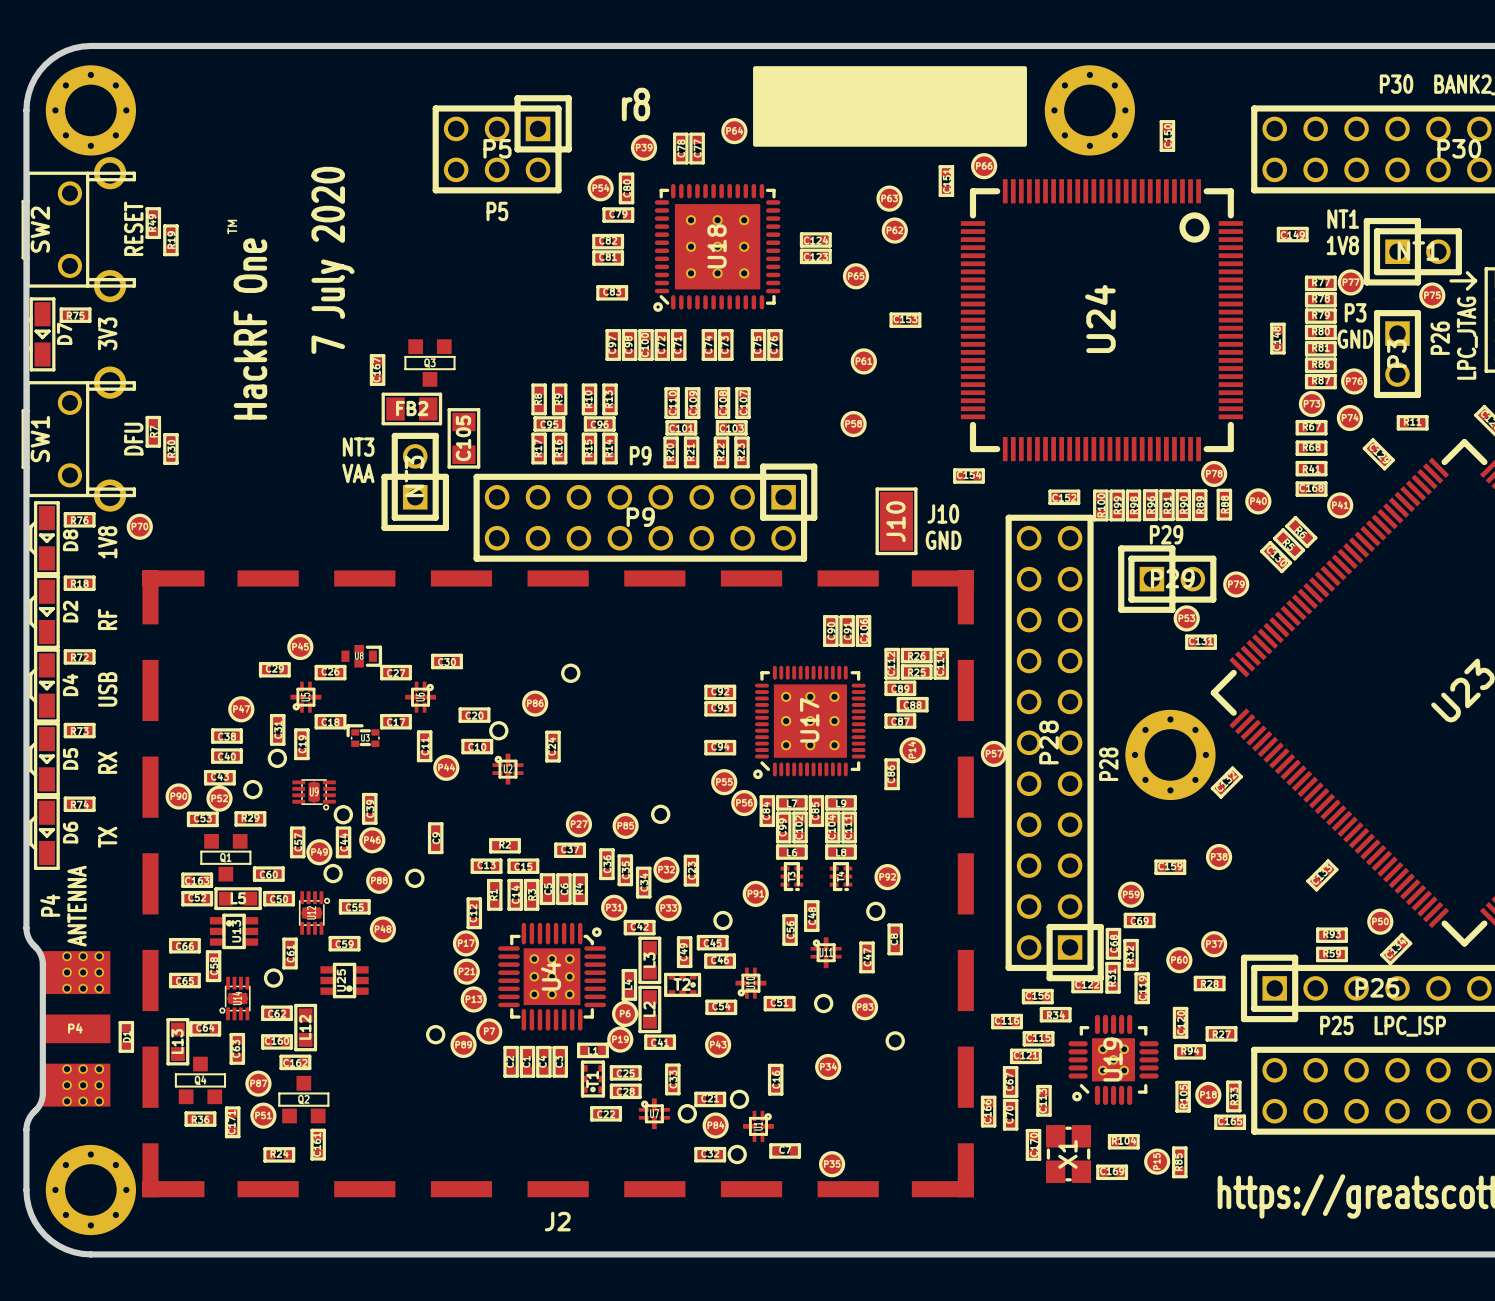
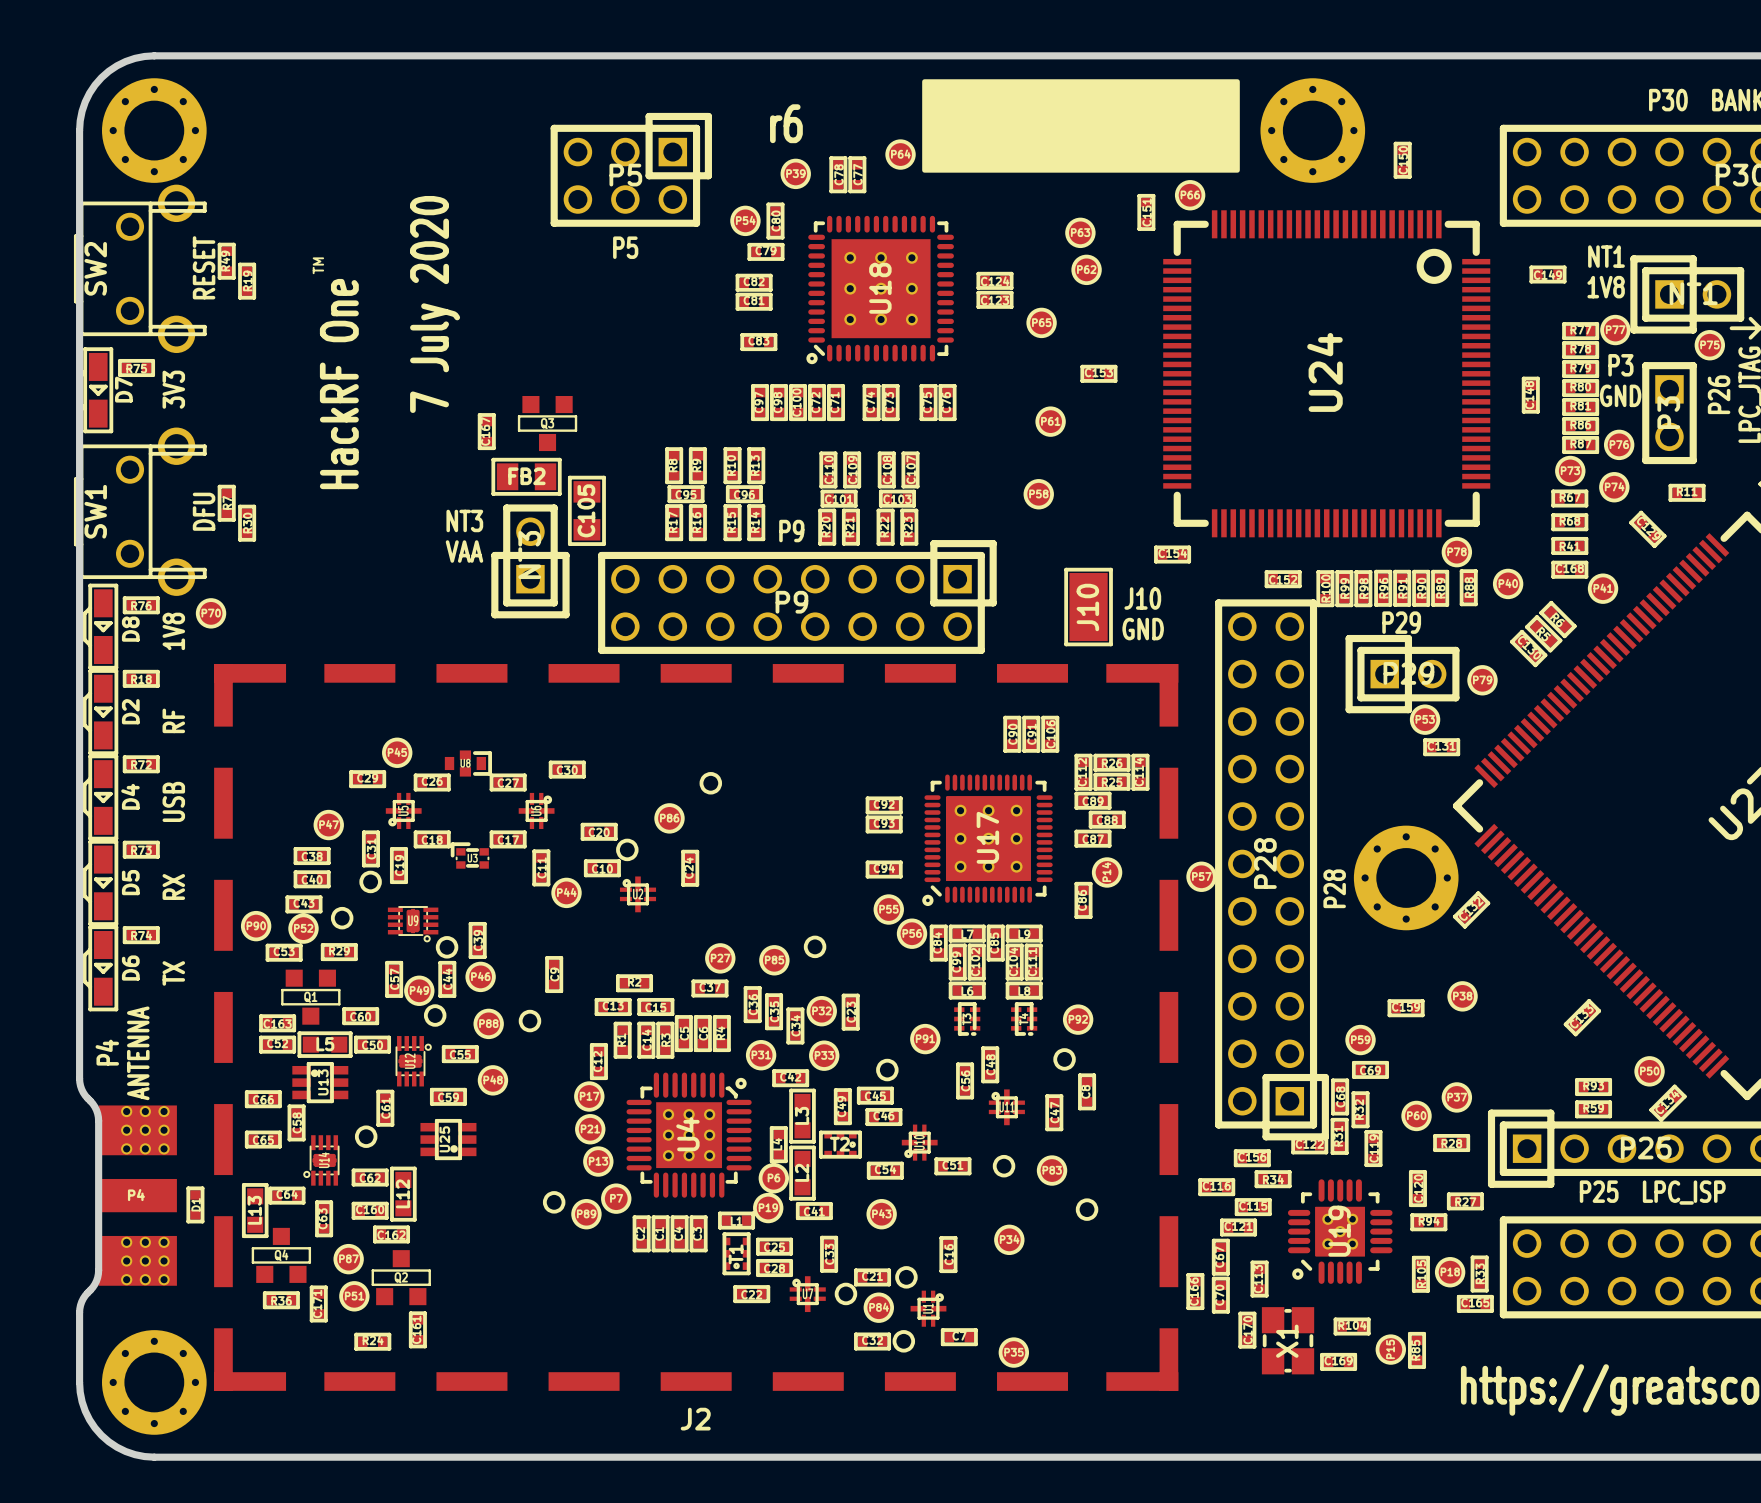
text: r8 (635, 104) -> r6 (786, 123)

